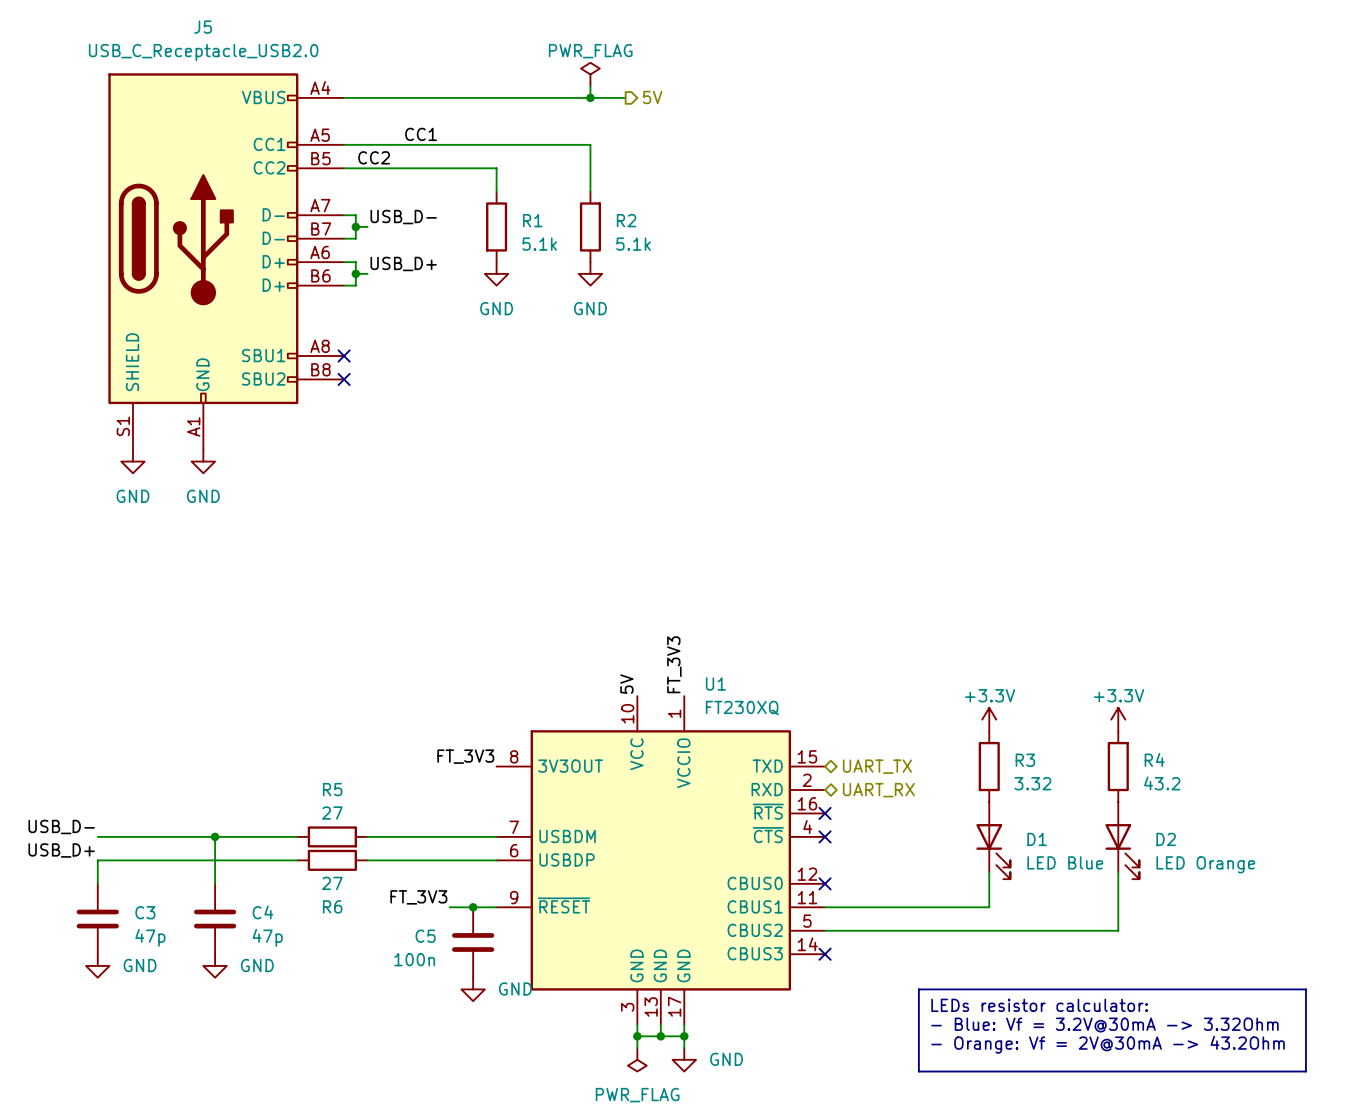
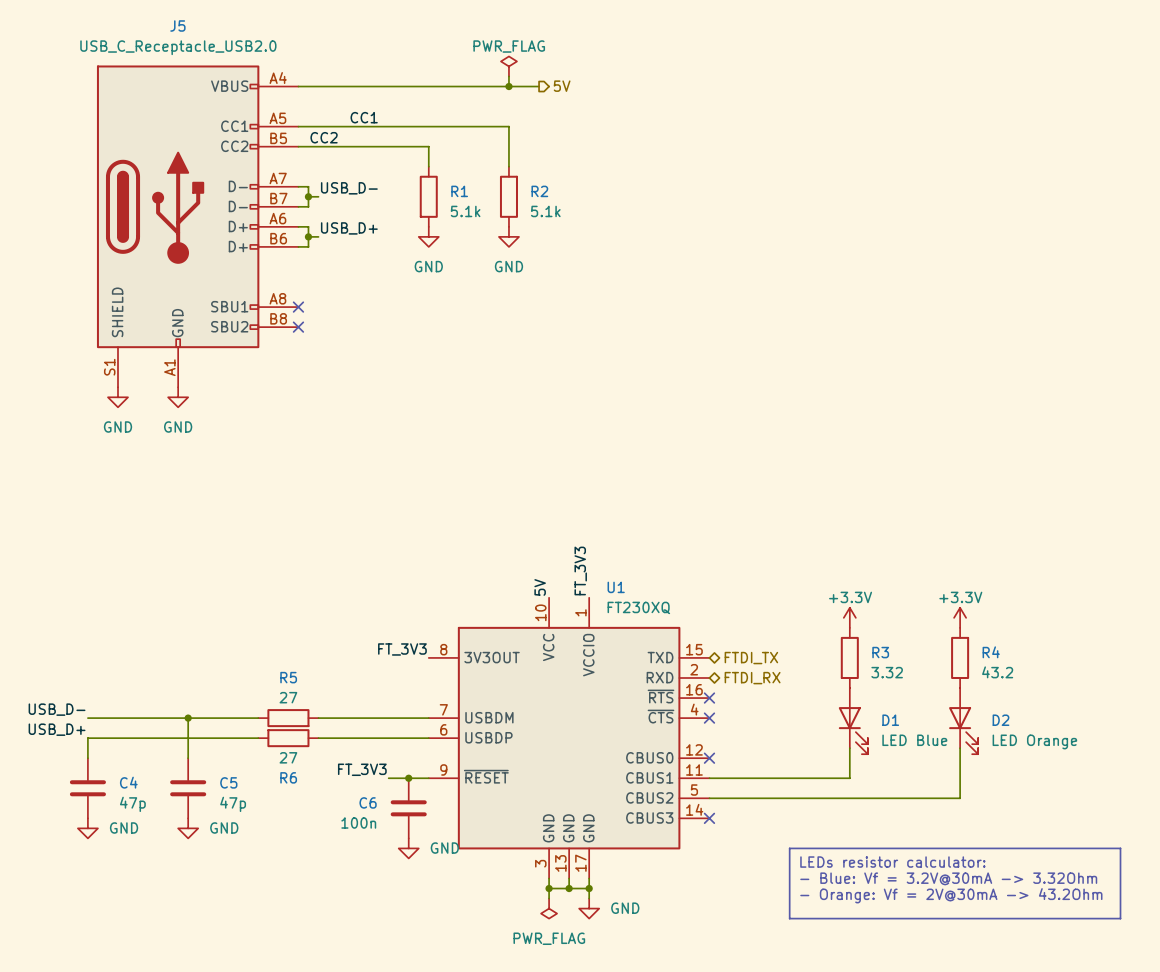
hierarchical label: UART_TX (877, 766) -> FTDI_TX (751, 658)
hierarchical label: UART_RX (878, 790) -> FTDI_RX (752, 678)
C3 name: C3 (145, 912) -> C4 (128, 782)
C4 name: C4 (262, 912) -> C5 (228, 782)
C5 name: C5 (425, 936) -> C6 (368, 802)

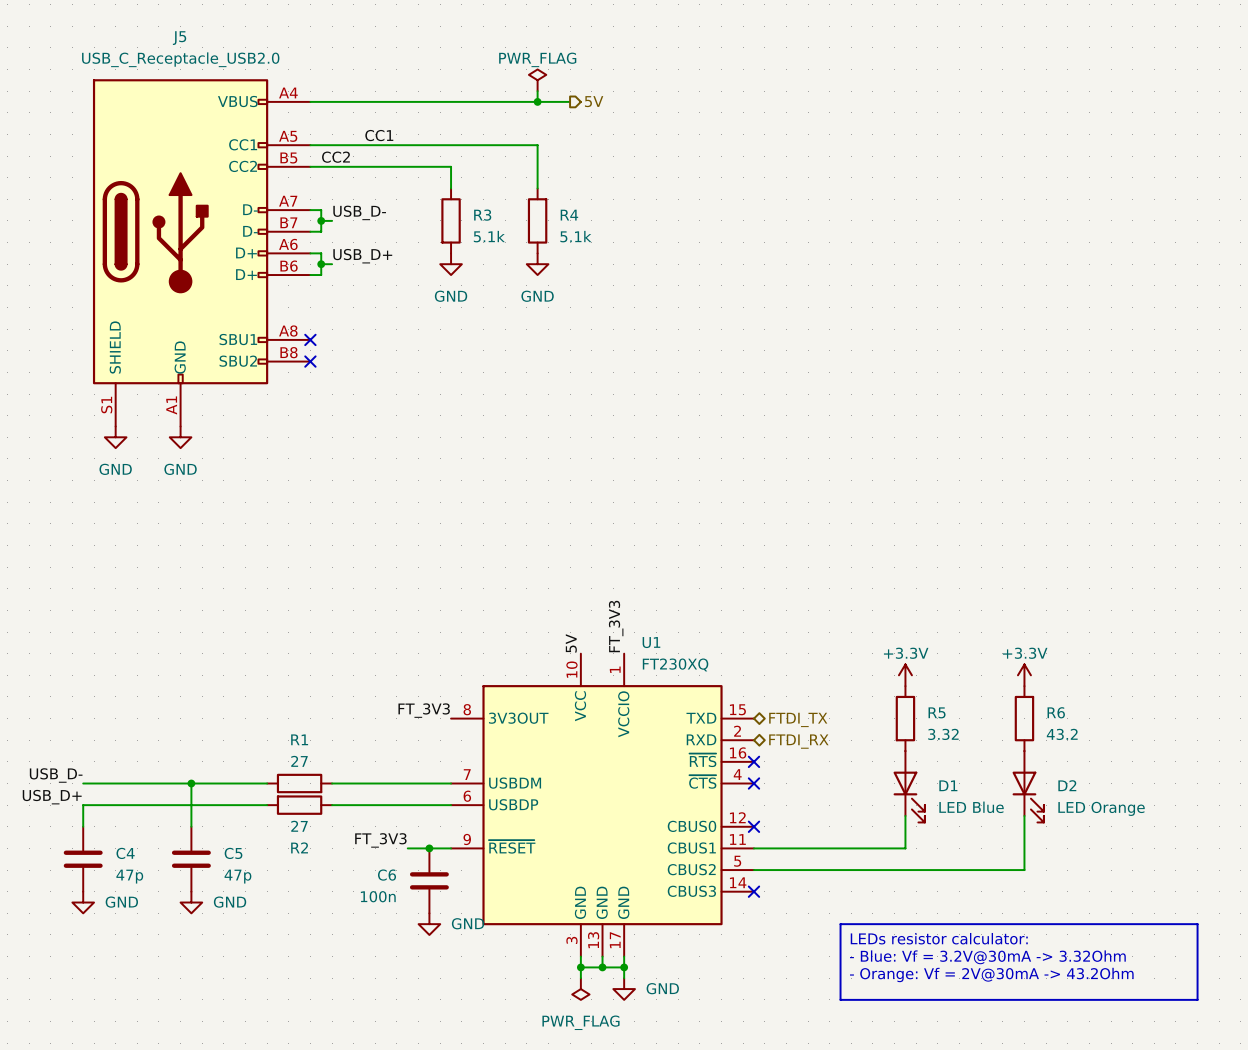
R1 name: R1 (459, 191) -> R3 (482, 215)
R2 name: R2 (539, 191) -> R4 (569, 215)
R3 name: R3 (880, 652) -> R5 (937, 712)
R4 name: R4 (991, 652) -> R6 (1056, 712)
R5 name: R5 (288, 677) -> R1 (299, 739)
R6 name: R6 (288, 777) -> R2 (299, 847)

